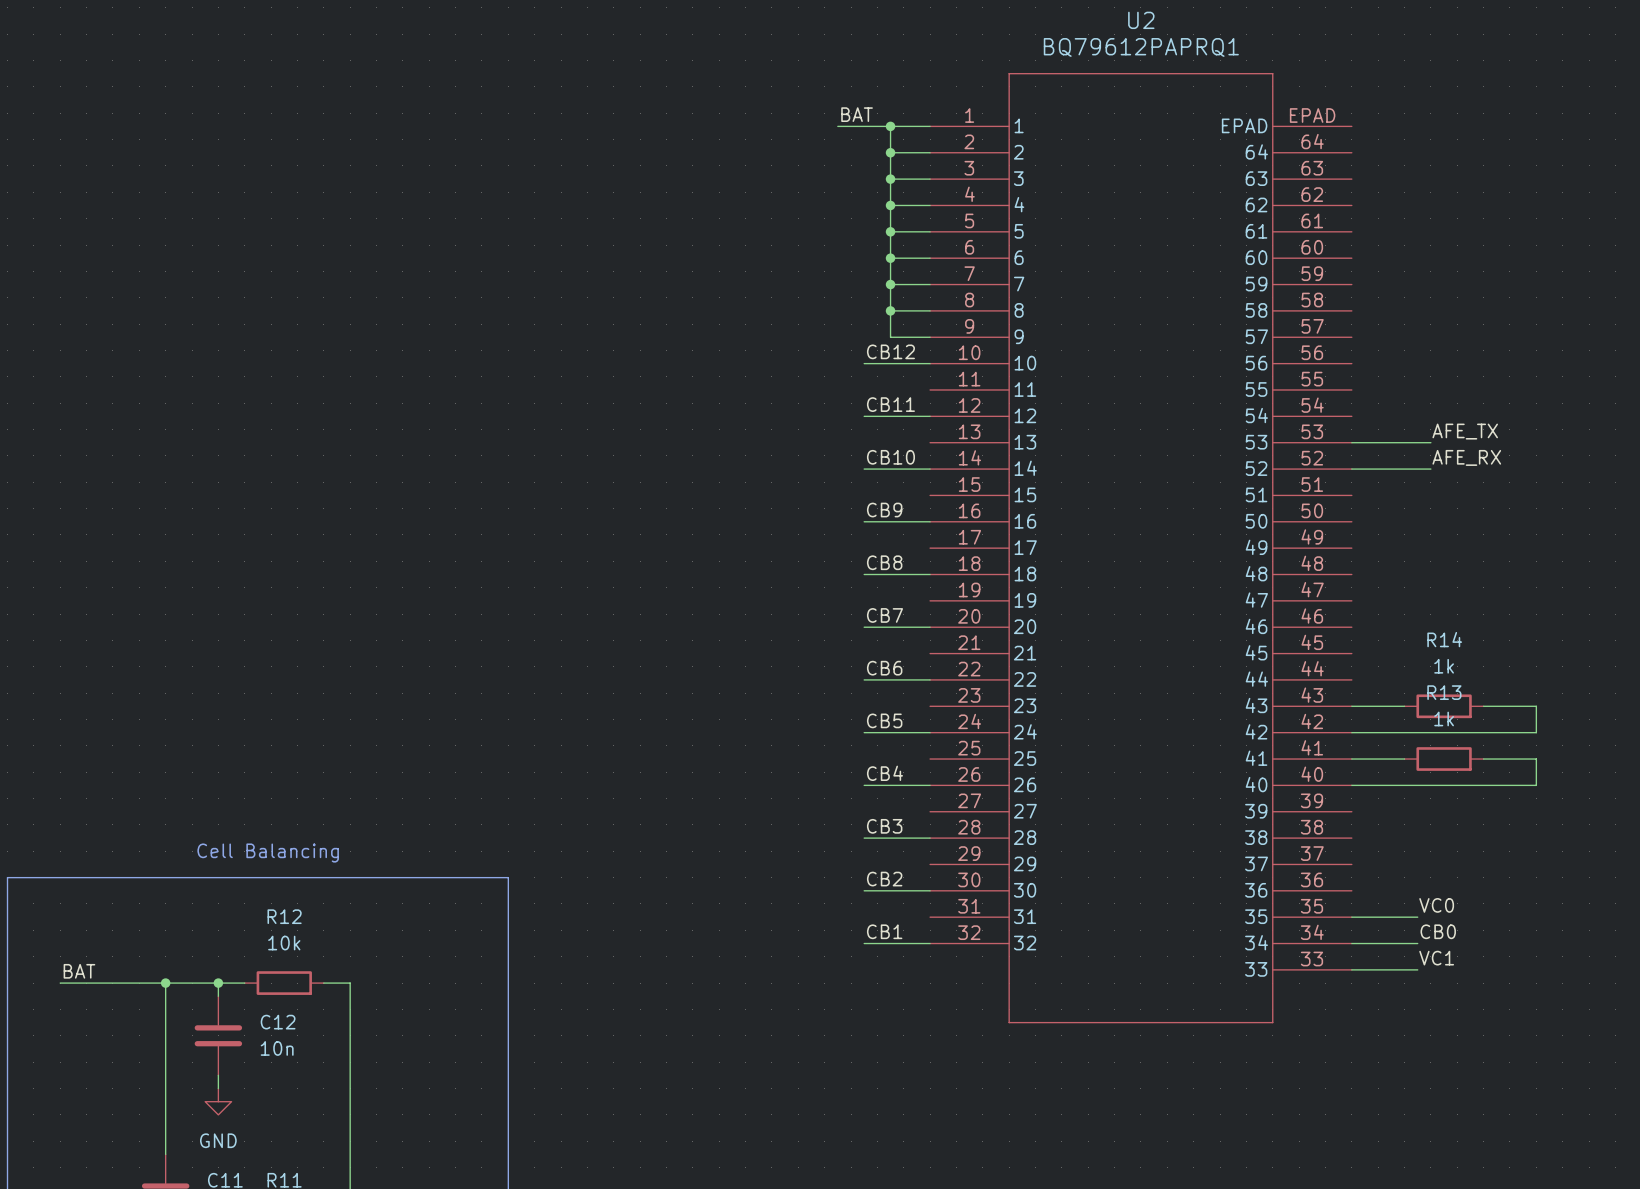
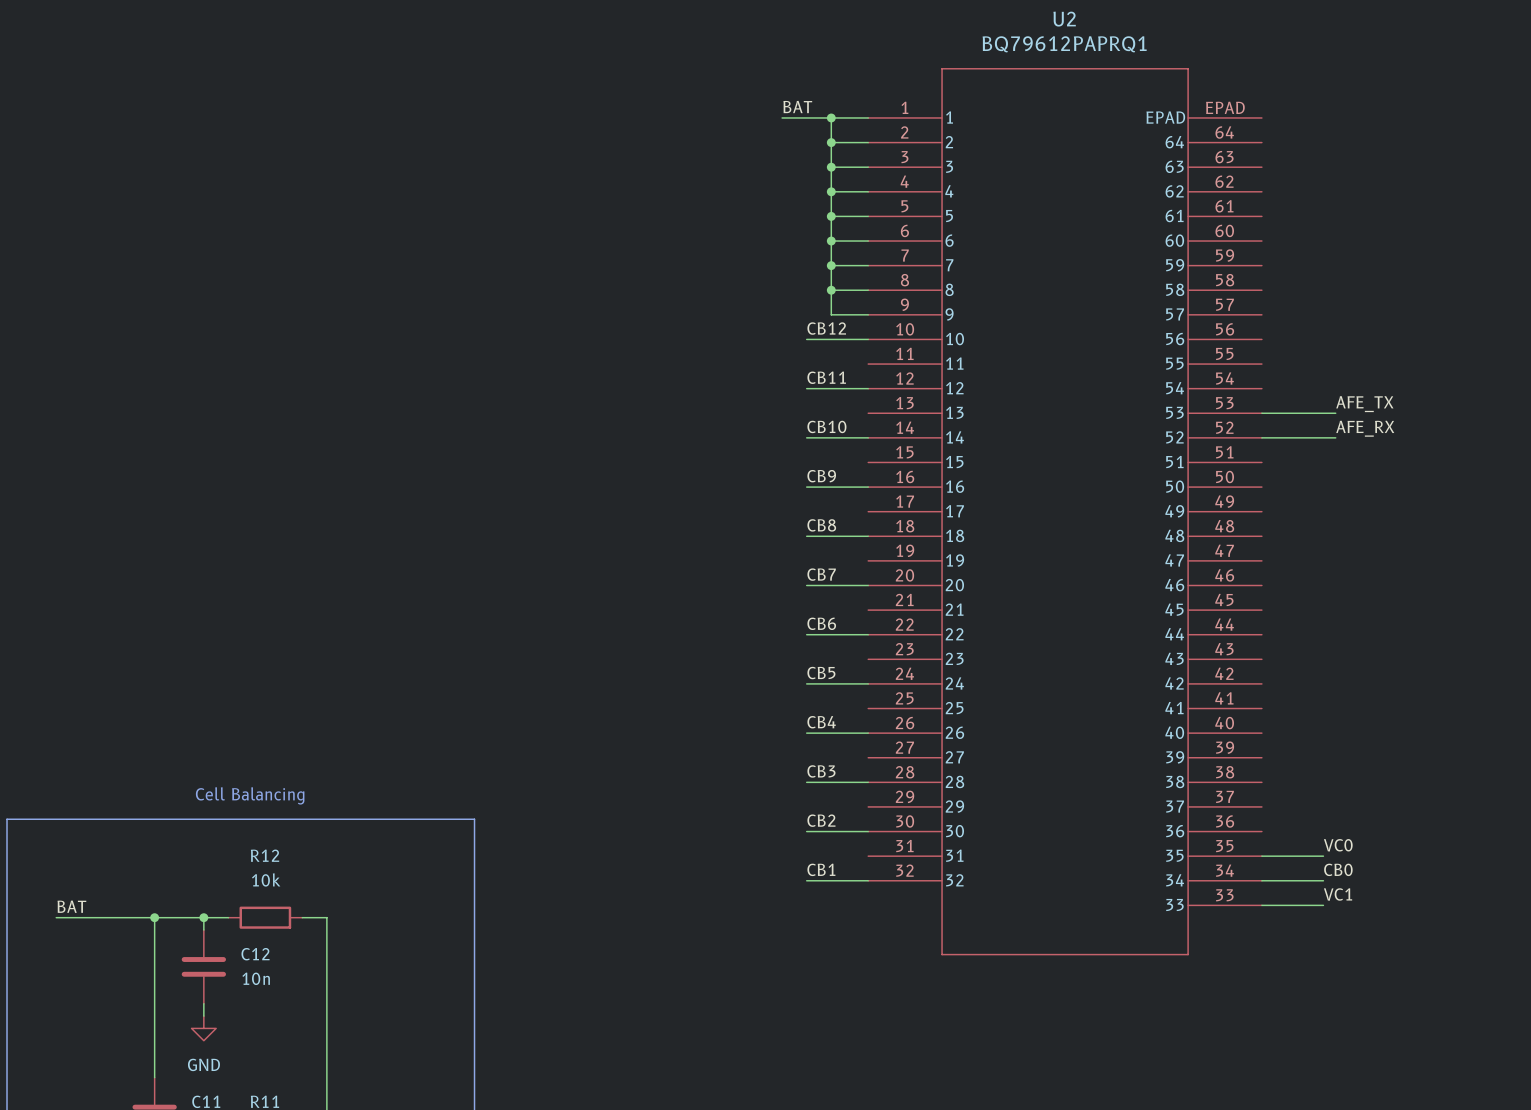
wire: (1351, 706) (1404, 706) -> none
R14: 1k (1444, 706) -> none
wire: (1483, 706) (1536, 706) (1536, 732) (1351, 732) -> none
wire: (1351, 759) (1404, 759) -> none
R13: 1k (1444, 759) -> none
wire: (1483, 759) (1536, 759) (1536, 785) (1351, 785) -> none

